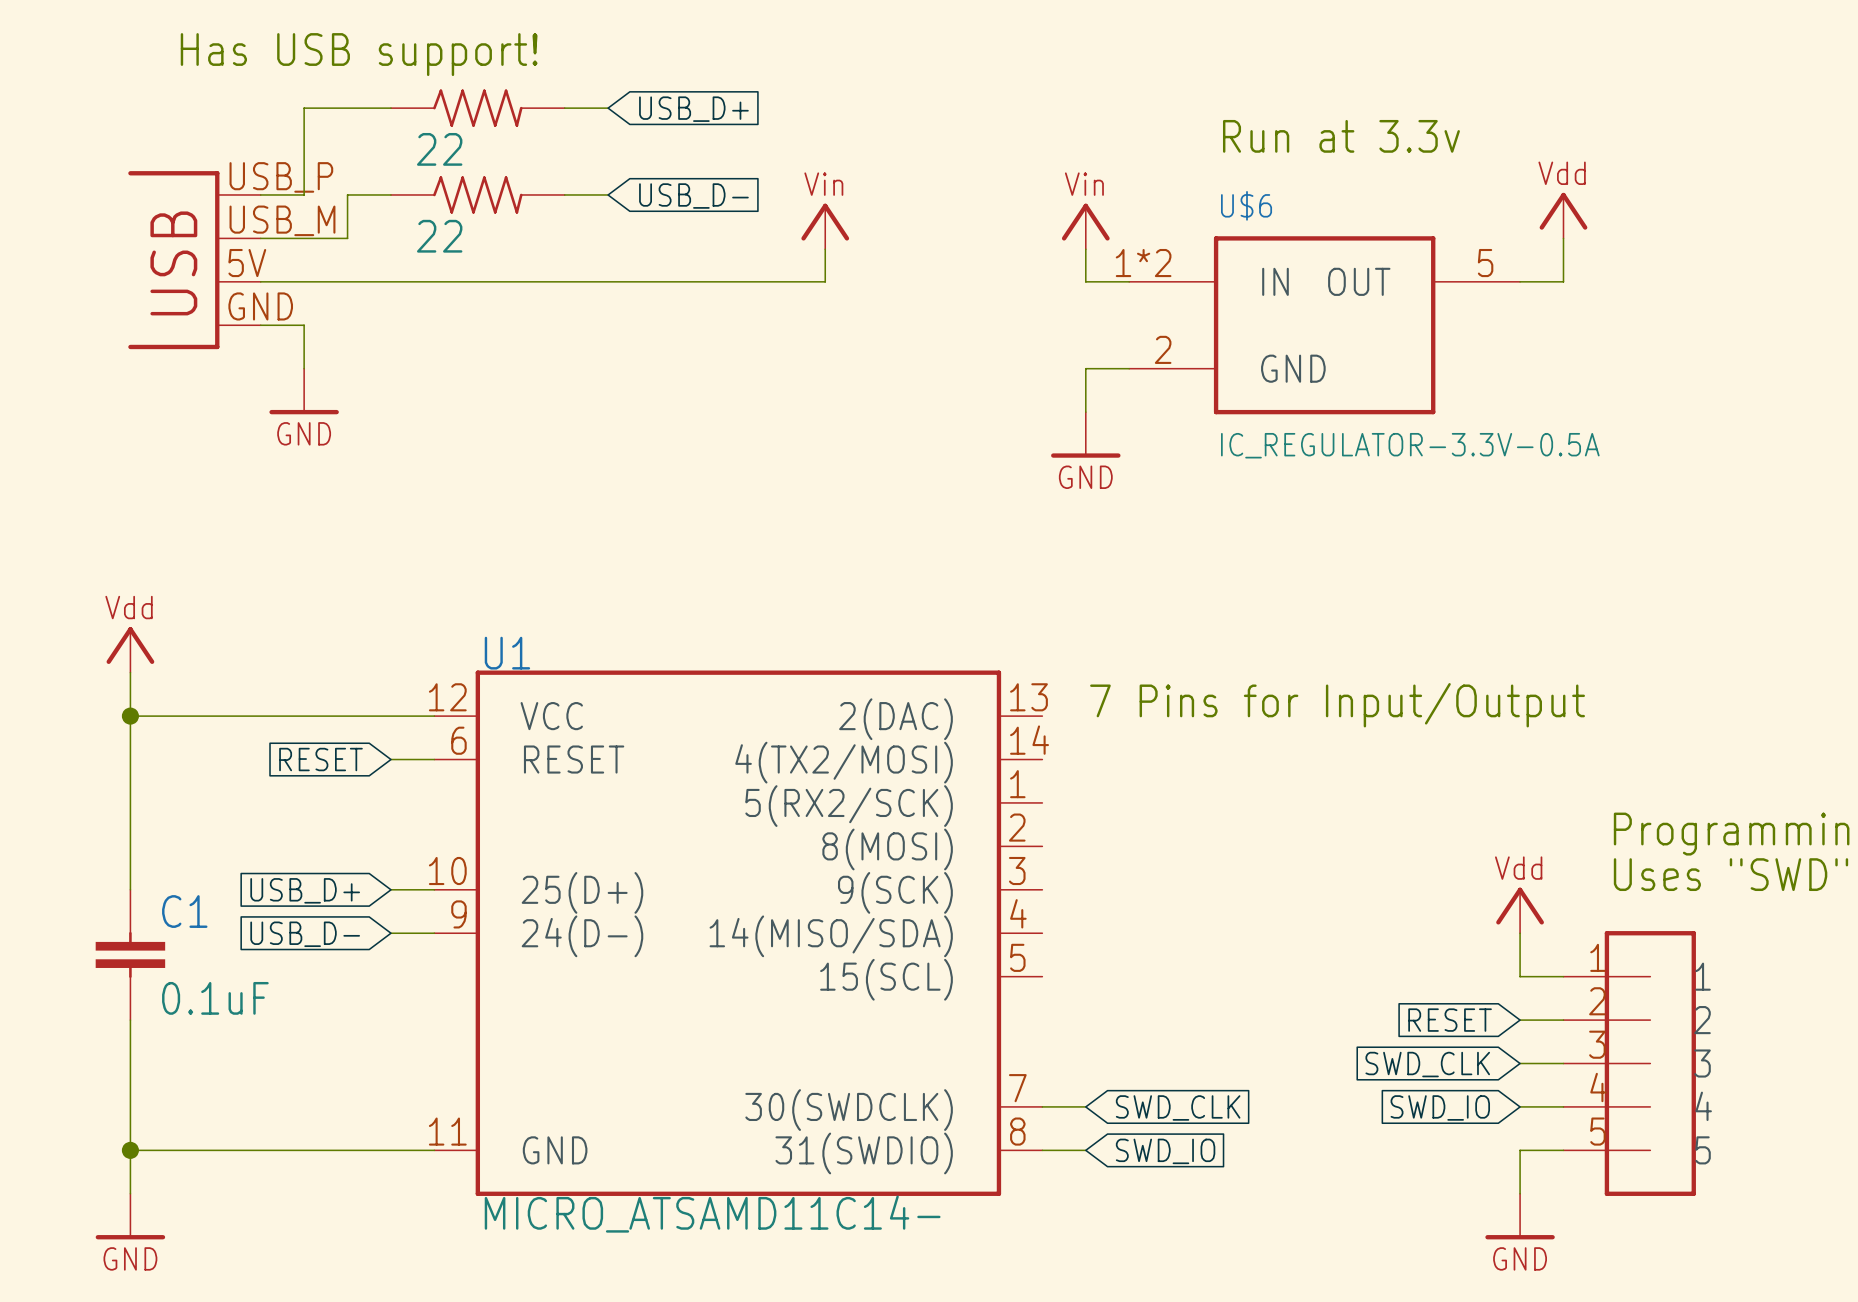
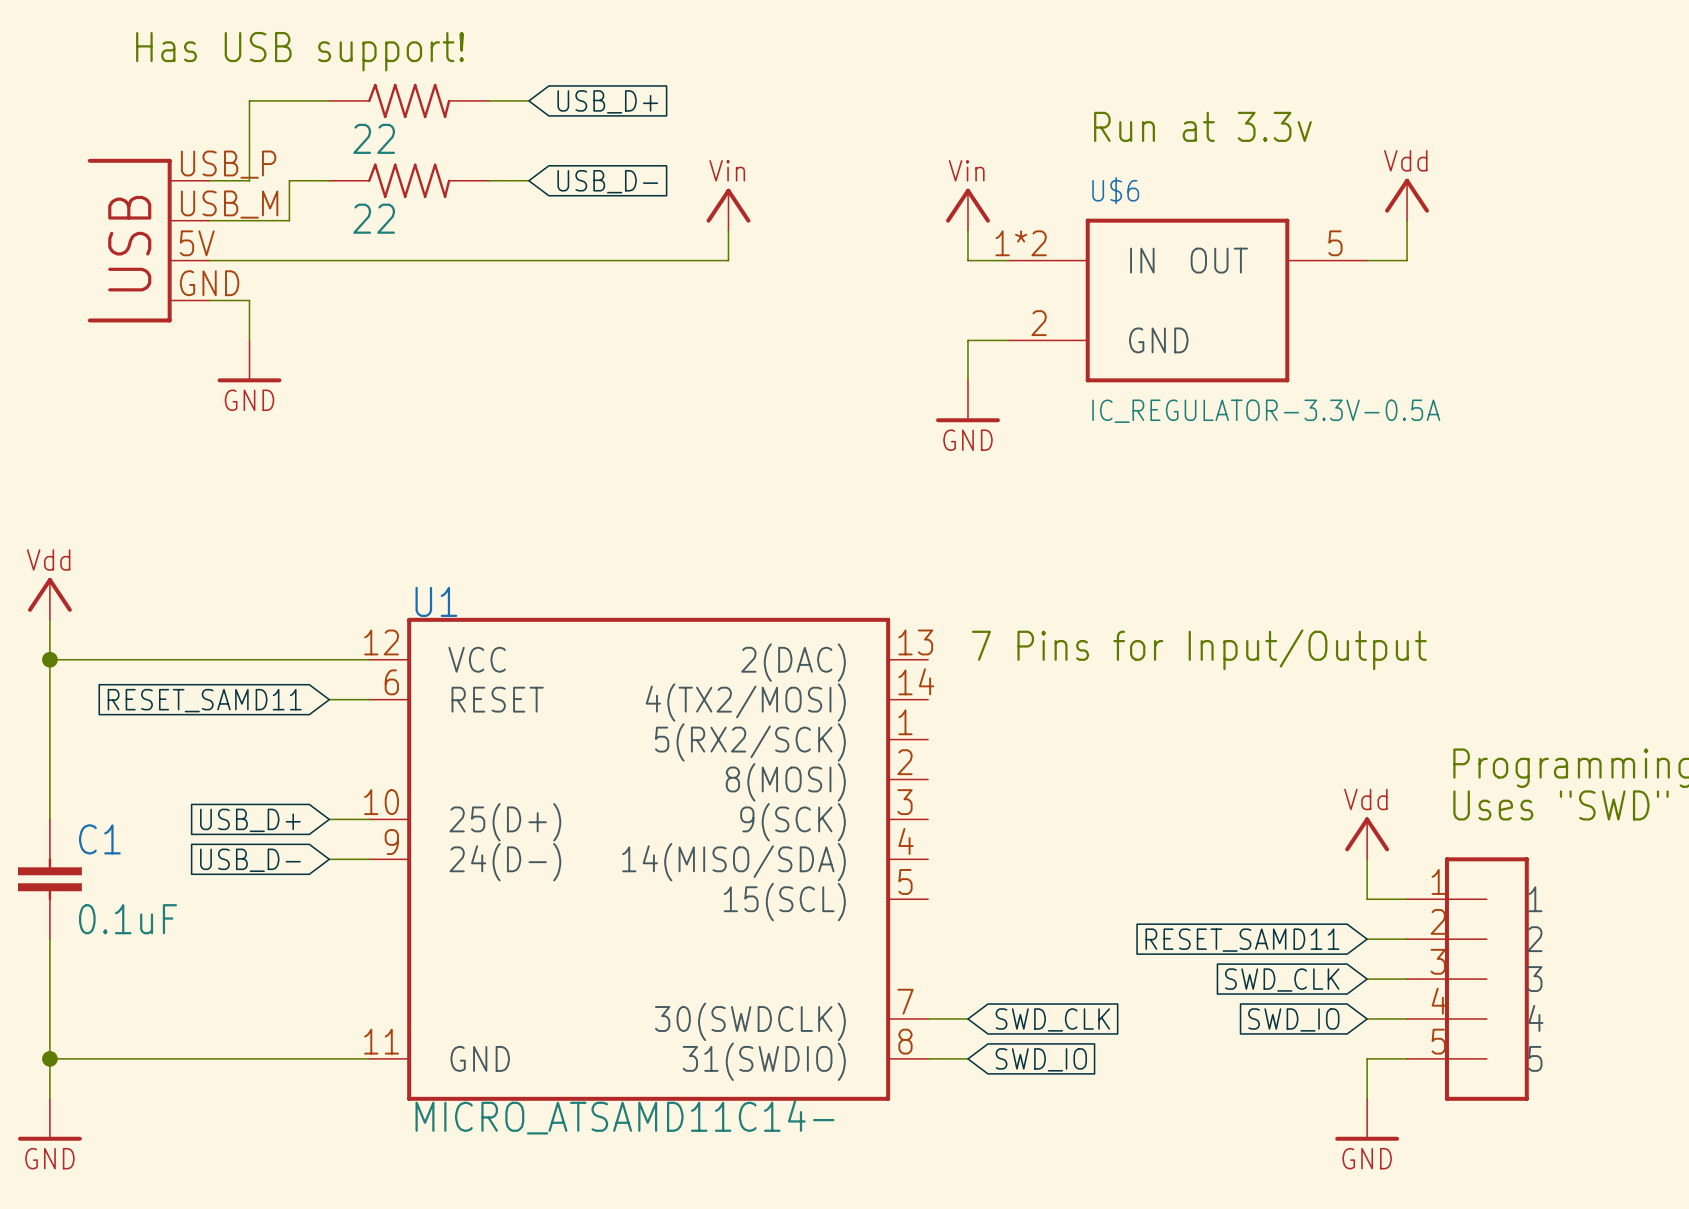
power symbol position: (130, 649) -> (49, 598)
wire: (130, 672) (130, 889) -> (49, 619) (49, 819)
wire: none -> (49, 659) (89, 659)
junction position: (130, 716) -> (49, 659)
global label: RESET (320, 759) -> RESET_SAMD11 (204, 700)
C1 position: (130, 954) -> (49, 879)
wire: (130, 1020) (130, 1193) -> (49, 939) (49, 1098)
global label: RESET (1450, 1020) -> RESET_SAMD11 (1242, 940)
wire: none -> (49, 1058) (89, 1058)
junction position: (130, 1150) -> (49, 1058)
power symbol position: (130, 1216) -> (49, 1119)

